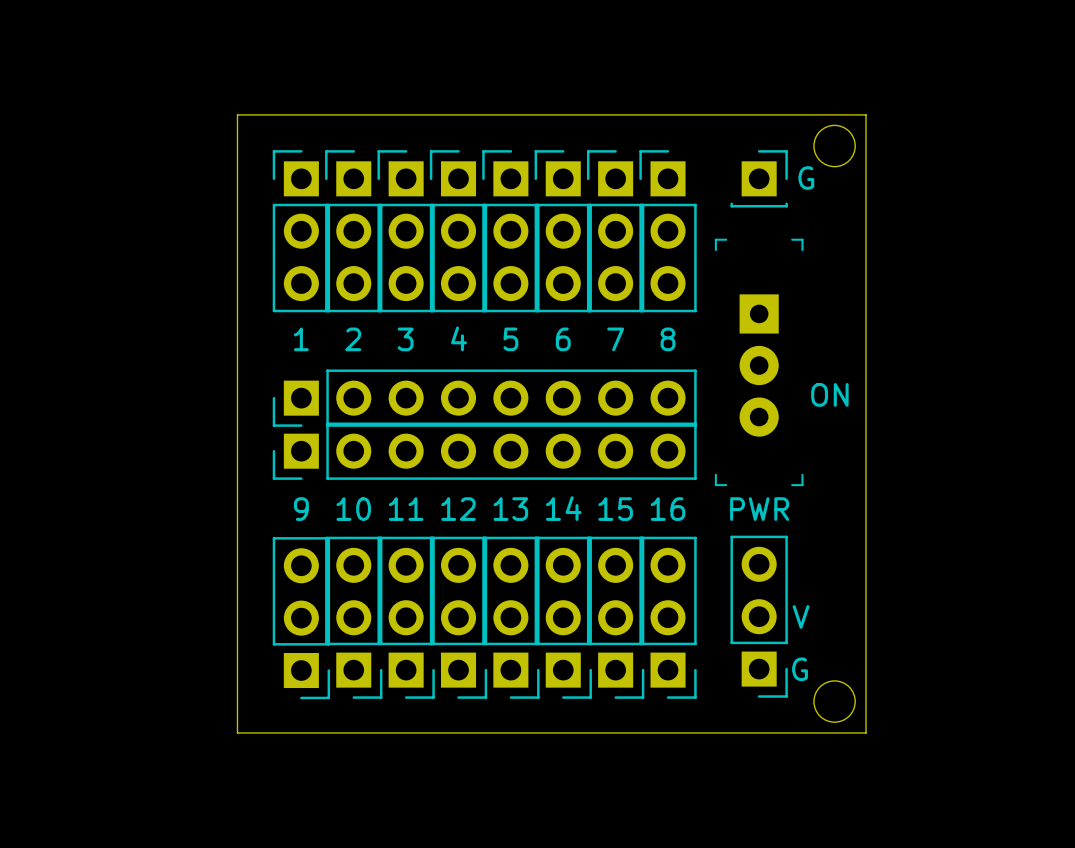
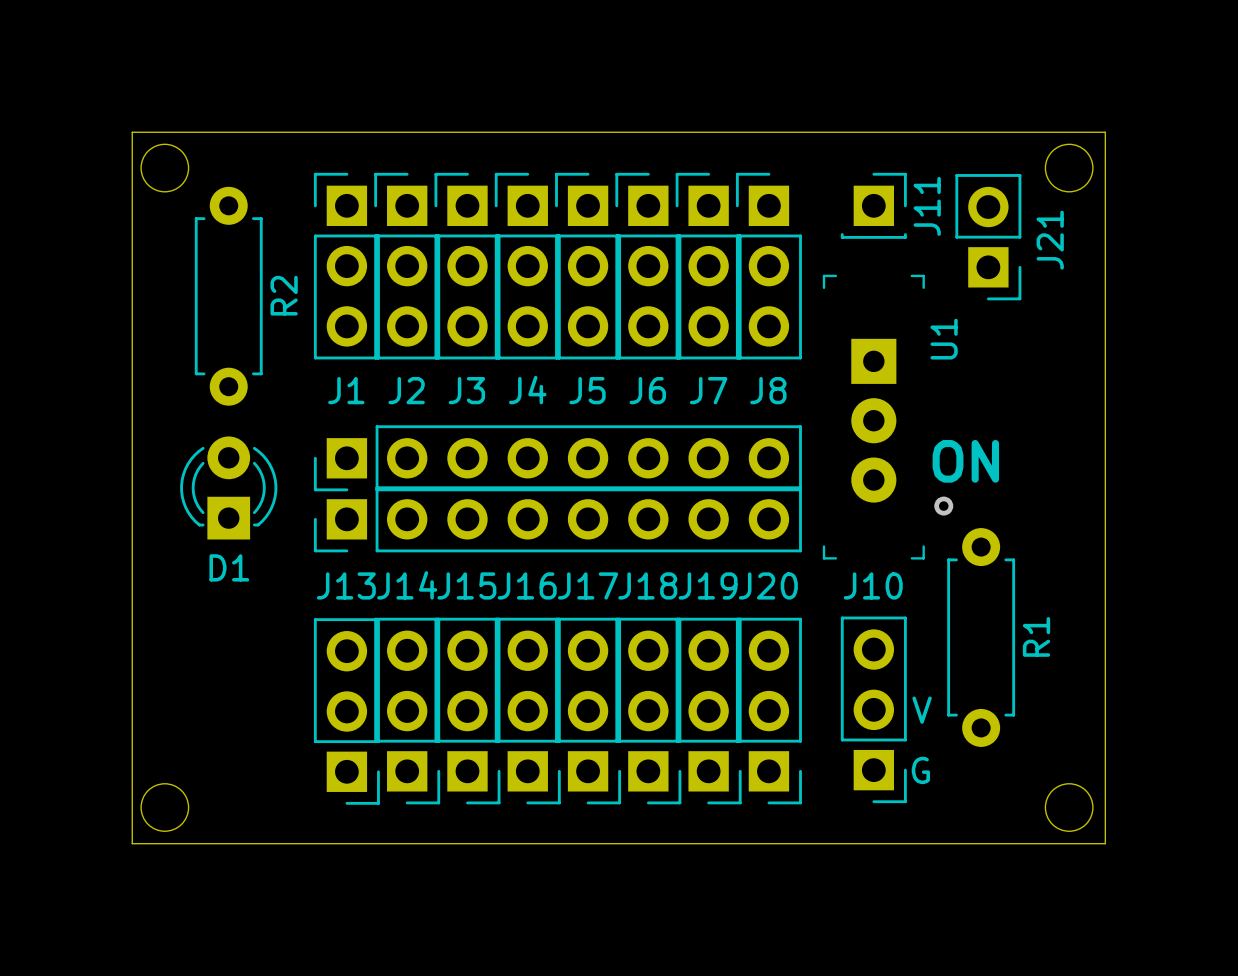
board edge: (237, 114) (237, 732) -> (273, 132) (132, 132) (132, 843) (273, 843)
board edge: (866, 114) (866, 732) -> (996, 132) (1105, 132) (1105, 843) (996, 843)
round board edge: none -> [140, 143, 190, 193]
round board edge position: (834, 146) -> (1069, 168)
G name: G (806, 178) -> J11 (927, 206)
J21: none -> (988, 237)
R2: none -> (228, 296)
4 name: 4 (459, 338) -> J4 (527, 390)
1 name: 1 (301, 339) -> J1 (346, 390)
2 name: 2 (353, 339) -> J2 (406, 390)
3 name: 3 (405, 339) -> J3 (466, 390)
5 name: 5 (510, 339) -> J5 (587, 390)
6 name: 6 (563, 339) -> J6 (647, 390)
7 name: 7 (615, 339) -> J7 (708, 390)
8 name: 8 (668, 339) -> J8 (768, 390)
ON name: ON (829, 394) -> U1 (944, 339)
text: none -> ON (965, 461)
D1: none -> (228, 487)
via: none -> (943, 506)
14 name: 14 (563, 508) -> J18 (647, 585)
9 name: 9 (301, 509) -> J13 (346, 585)
10 name: 10 (353, 509) -> J14 (407, 585)
11 name: 11 (406, 509) -> J15 (466, 585)
12 name: 12 (458, 509) -> J16 (527, 585)
13 name: 13 (510, 509) -> J17 (588, 585)
15 name: 15 (615, 509) -> J19 (708, 585)
16 name: 16 (668, 509) -> J20 (768, 585)
PWR name: PWR (759, 509) -> J10 (873, 585)
R1: none -> (981, 637)
round board edge: none -> [140, 783, 190, 832]
round board edge position: (834, 701) -> (1069, 807)

